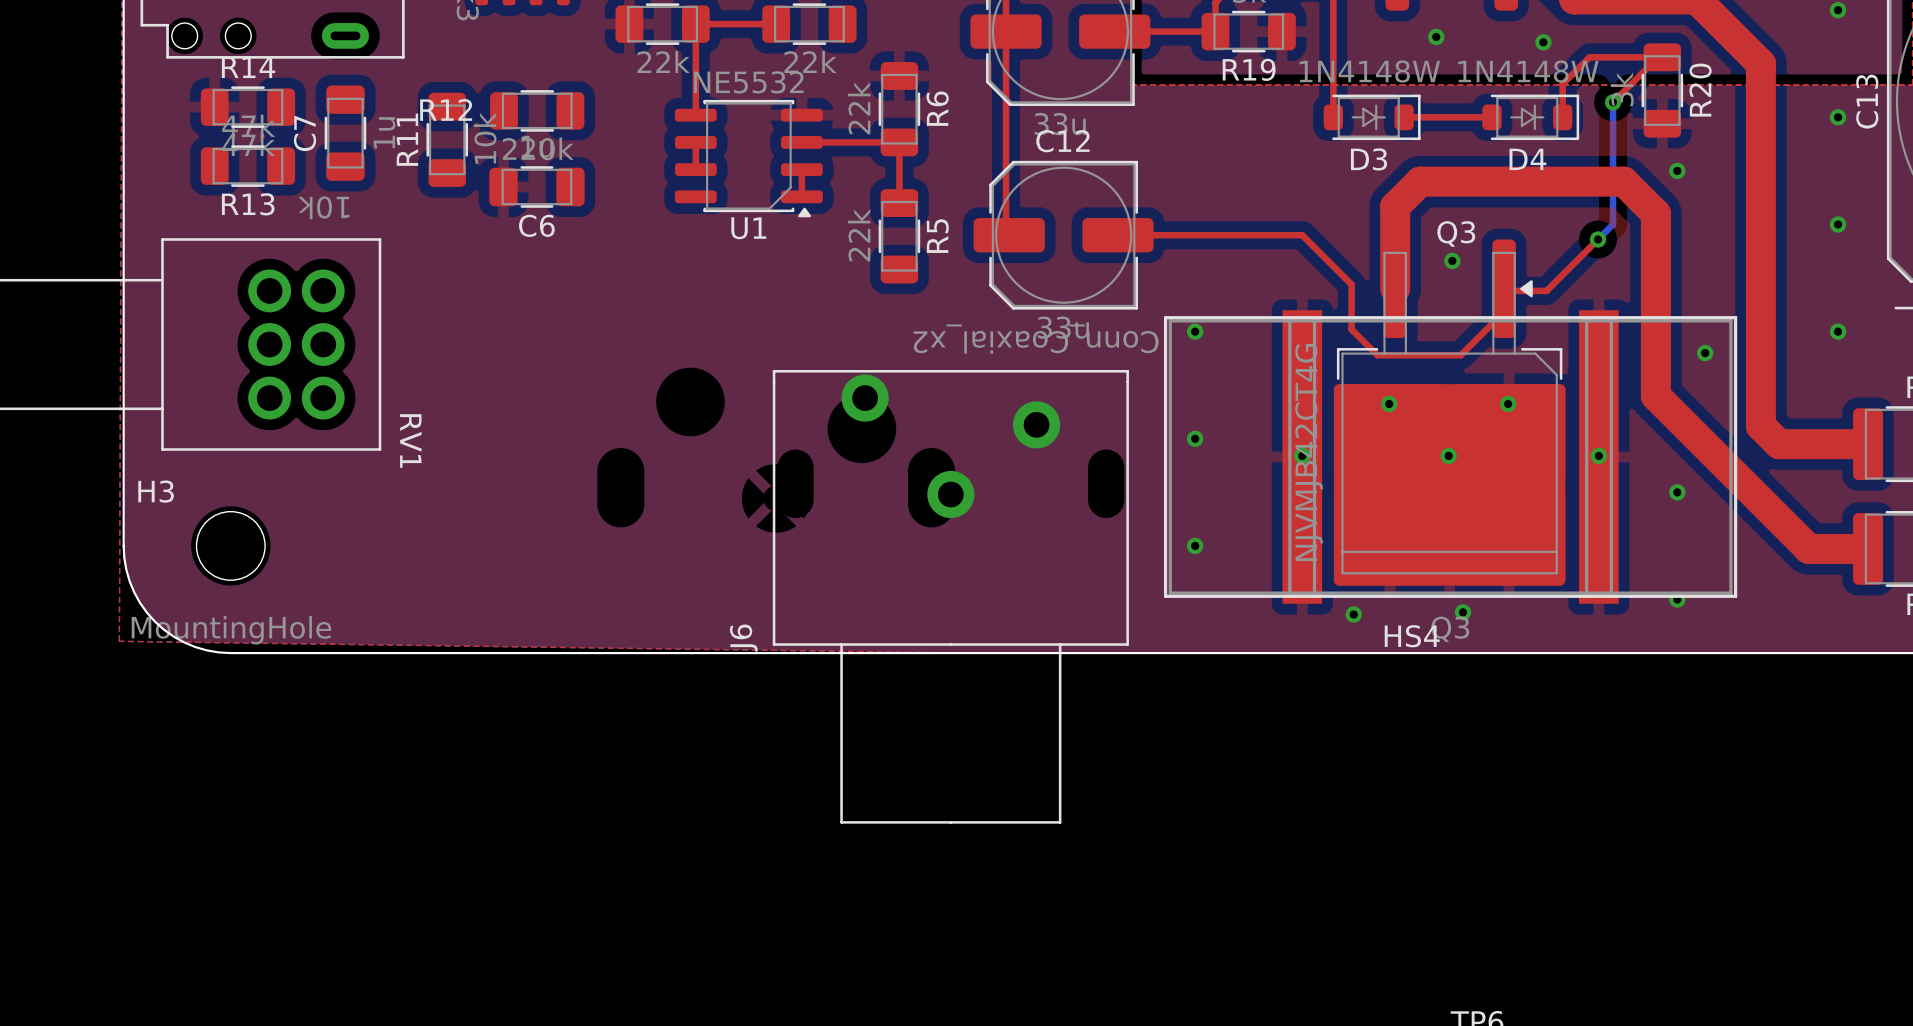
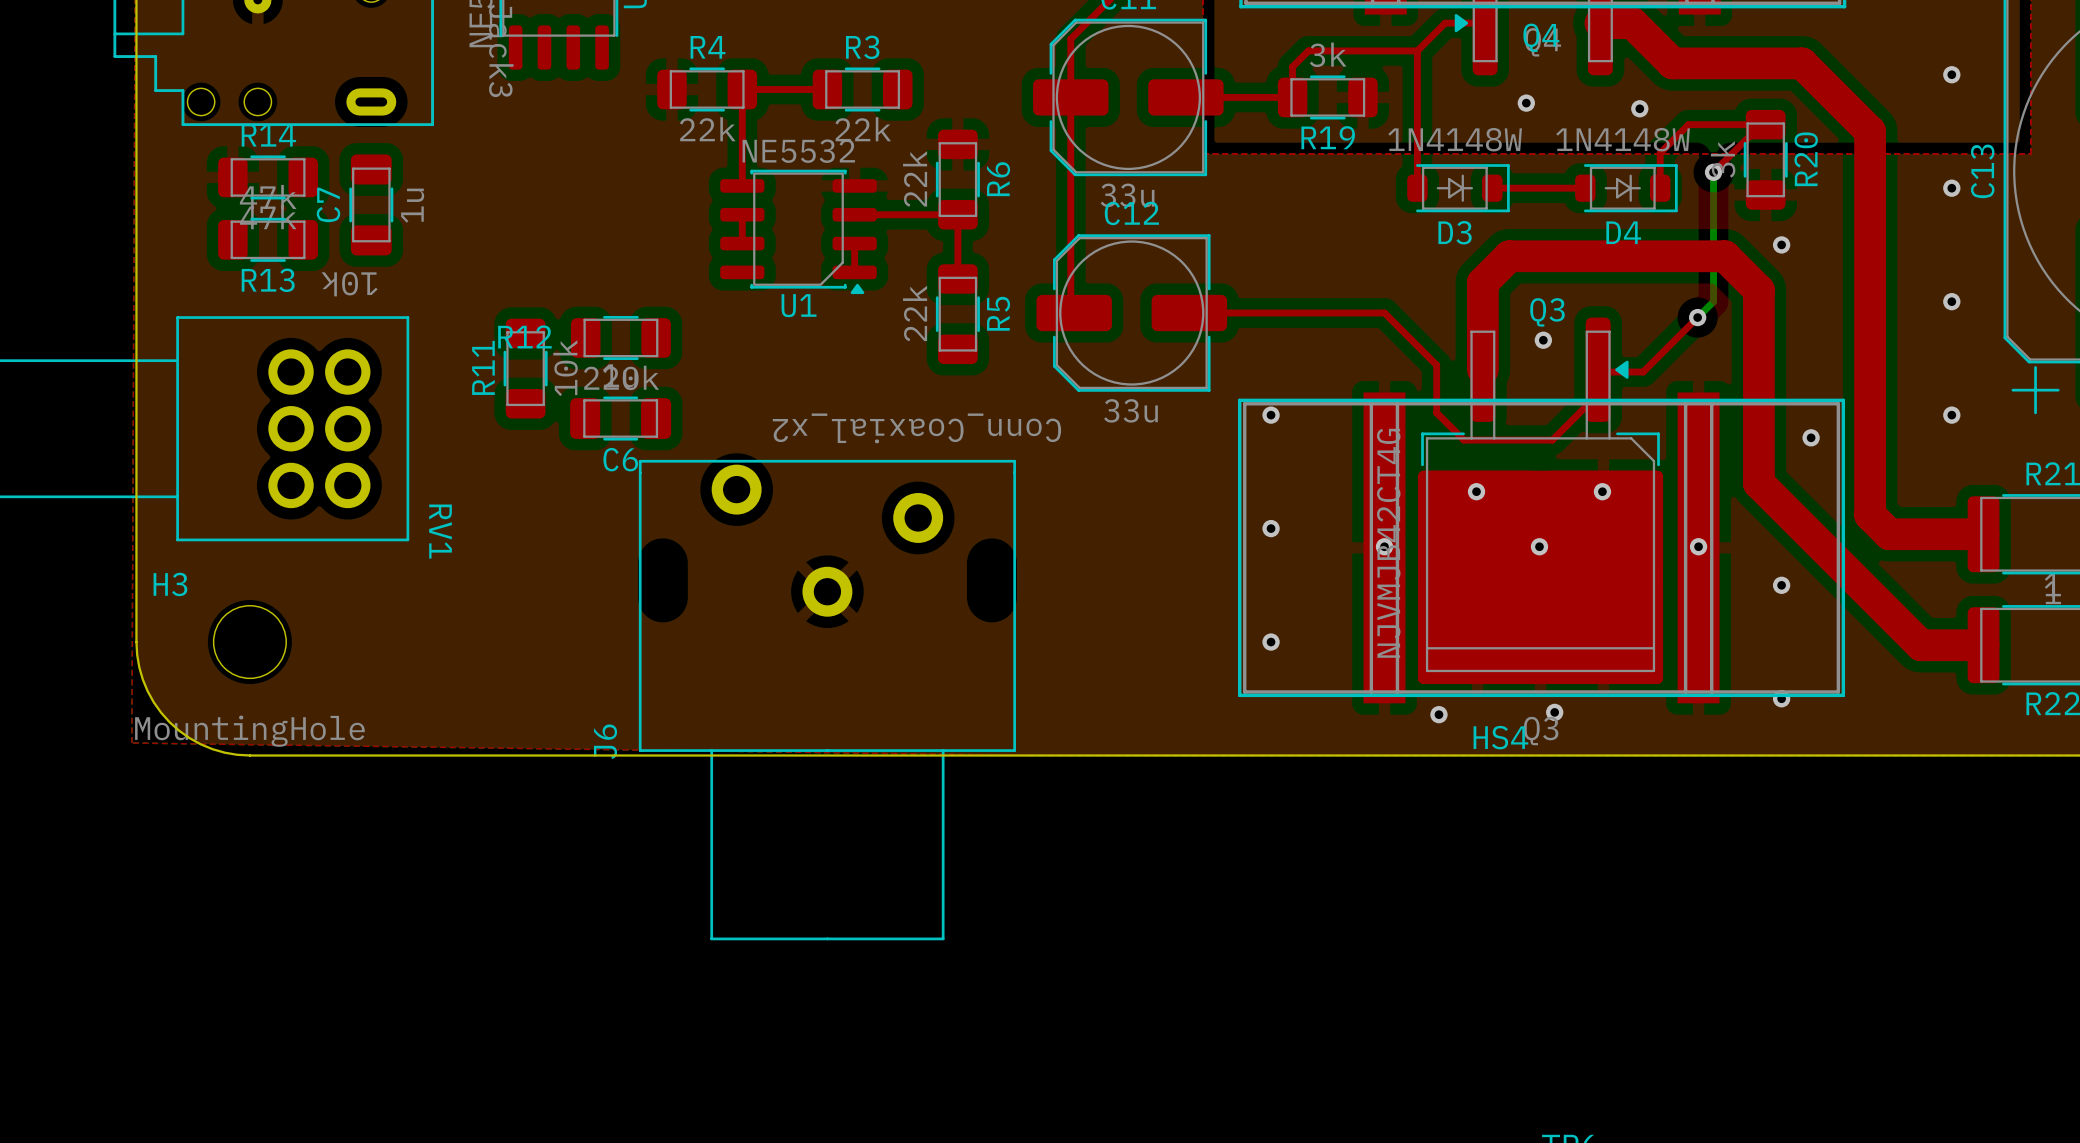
R12 position: (537, 110) -> (620, 337)
R11 position: (447, 139) -> (525, 368)
C6 position: (536, 186) -> (620, 418)
J6 position: (950, 596) -> (827, 700)

